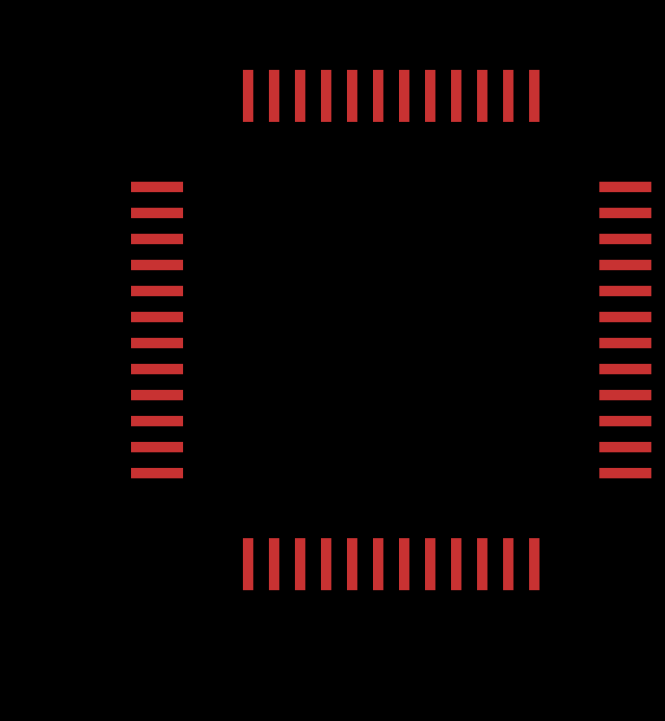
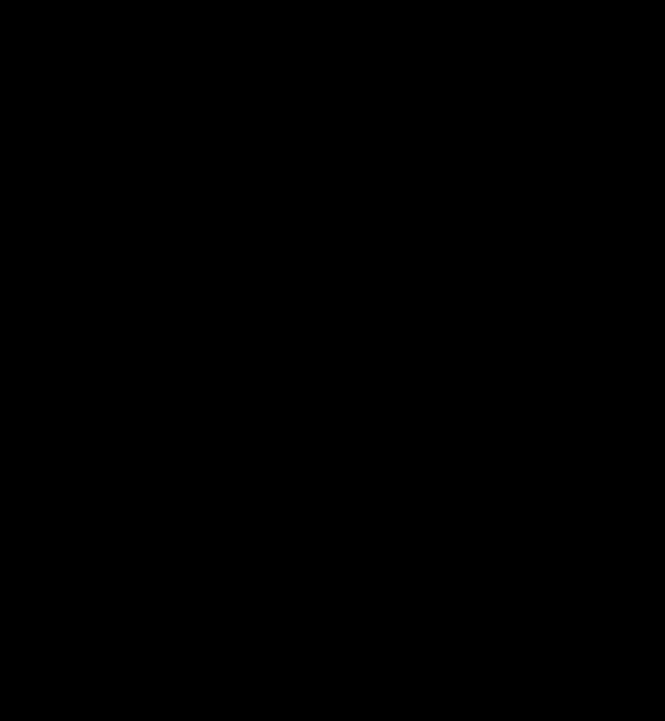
part: (391, 330) -> none

